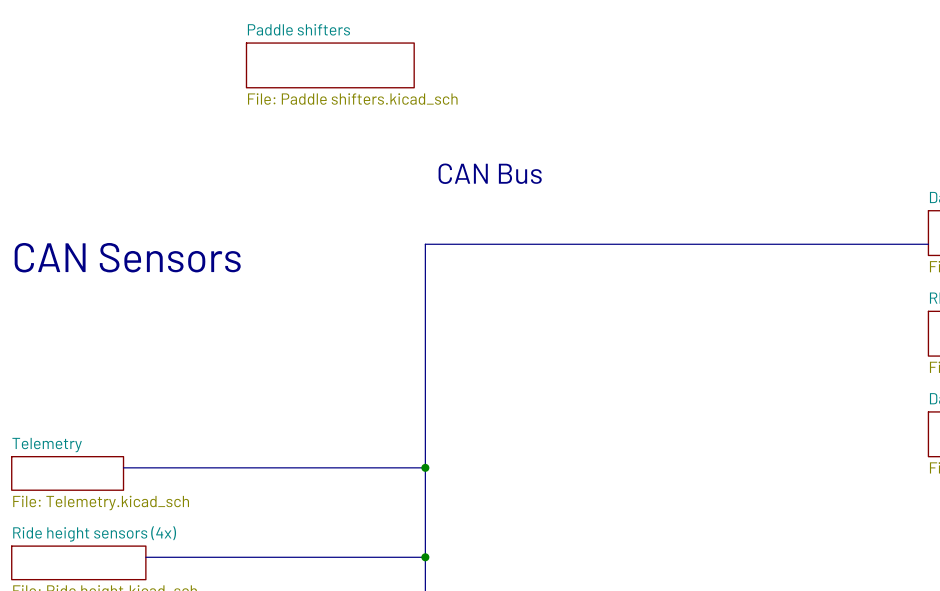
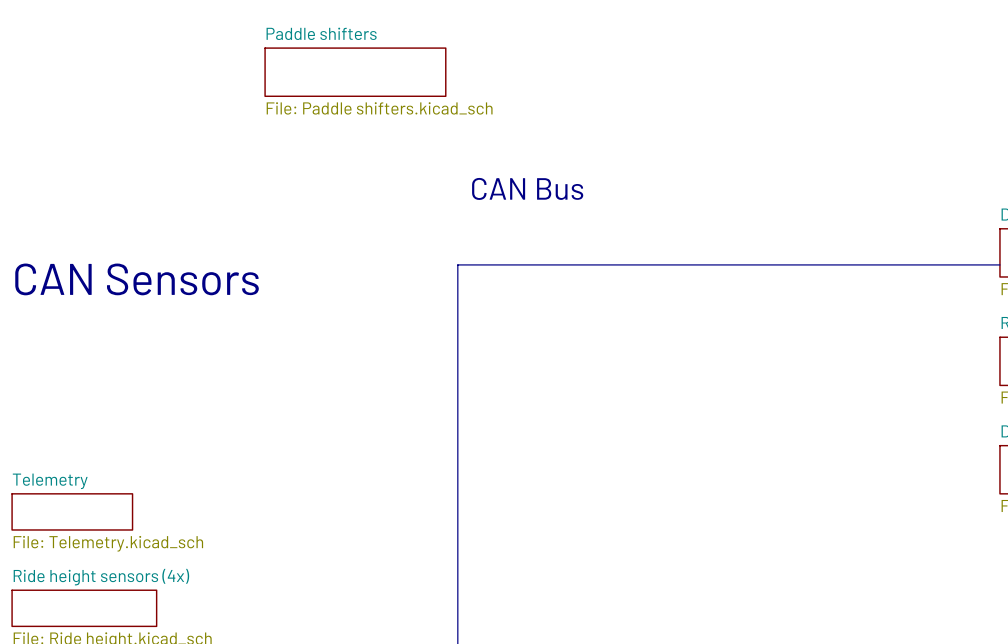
bus: (123, 467) (425, 467) -> none
junction: (425, 467) -> none
bus: (145, 557) (425, 557) -> none
junction: (425, 557) -> none

